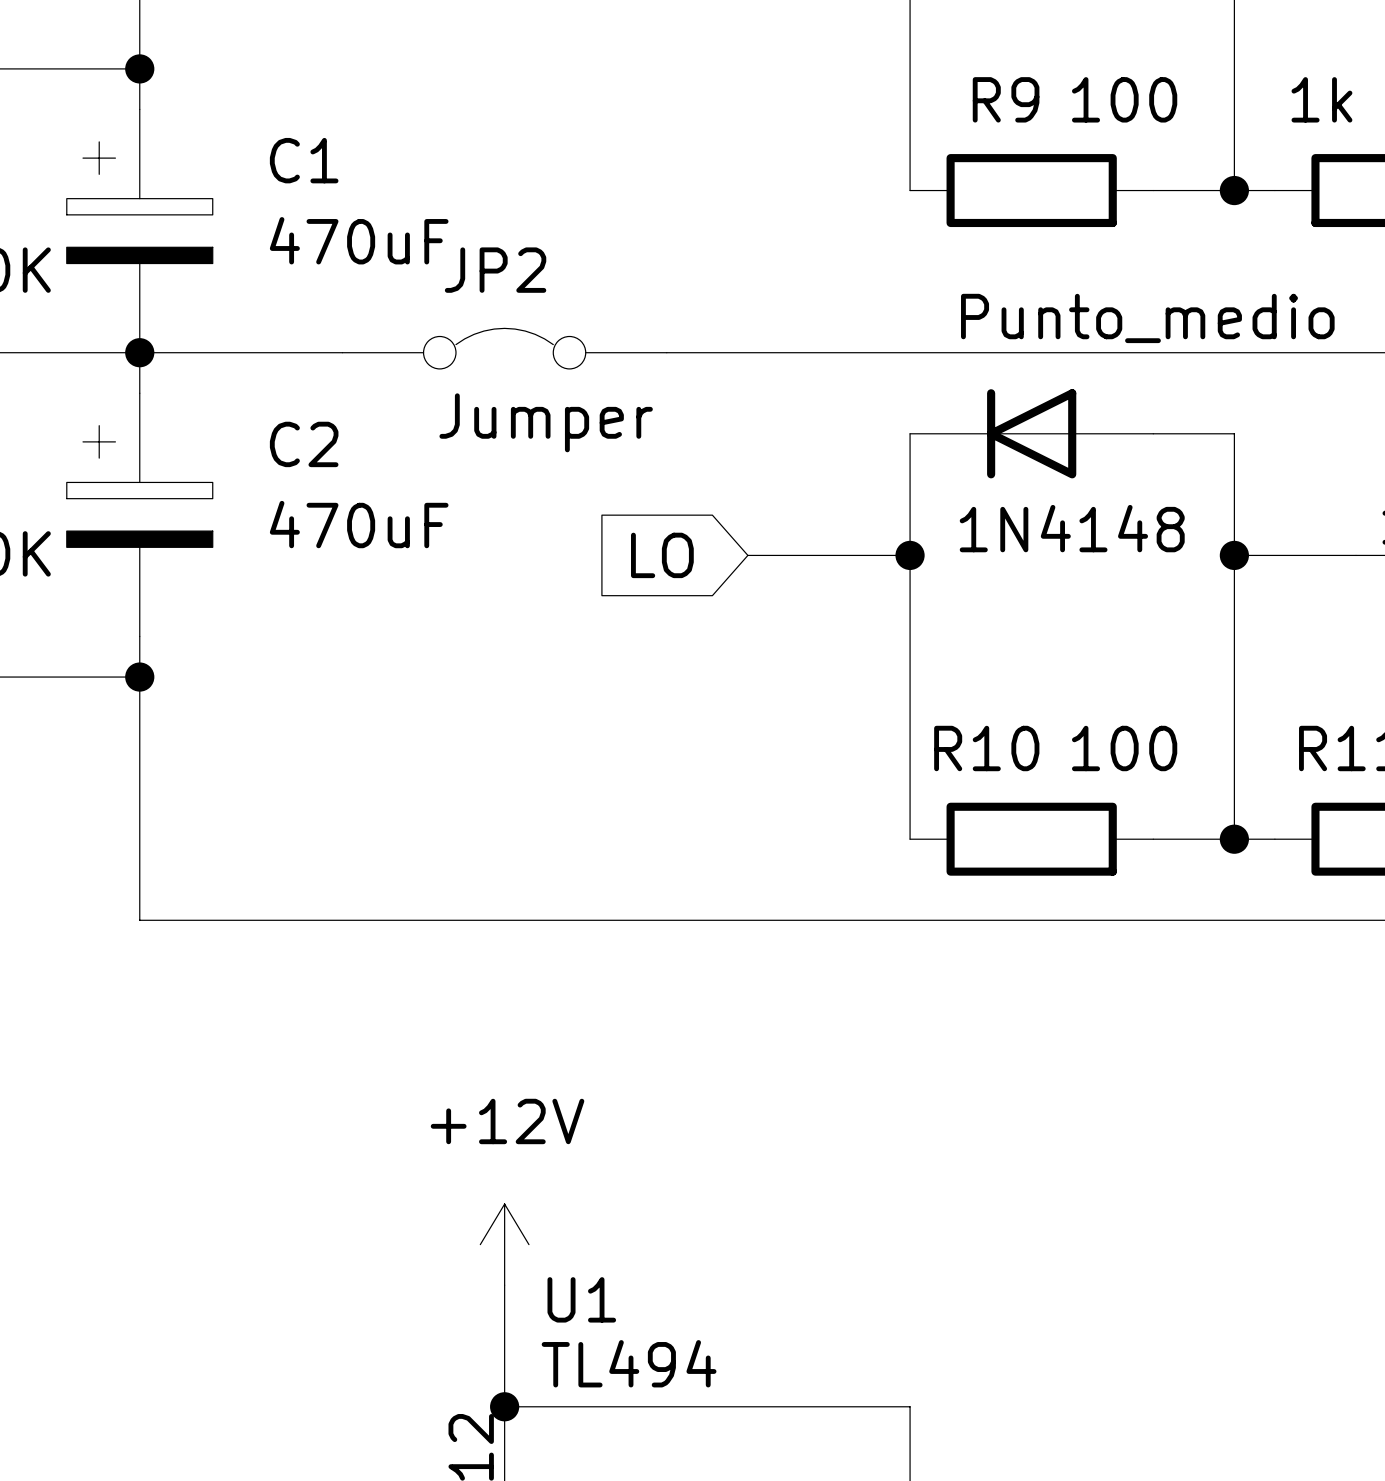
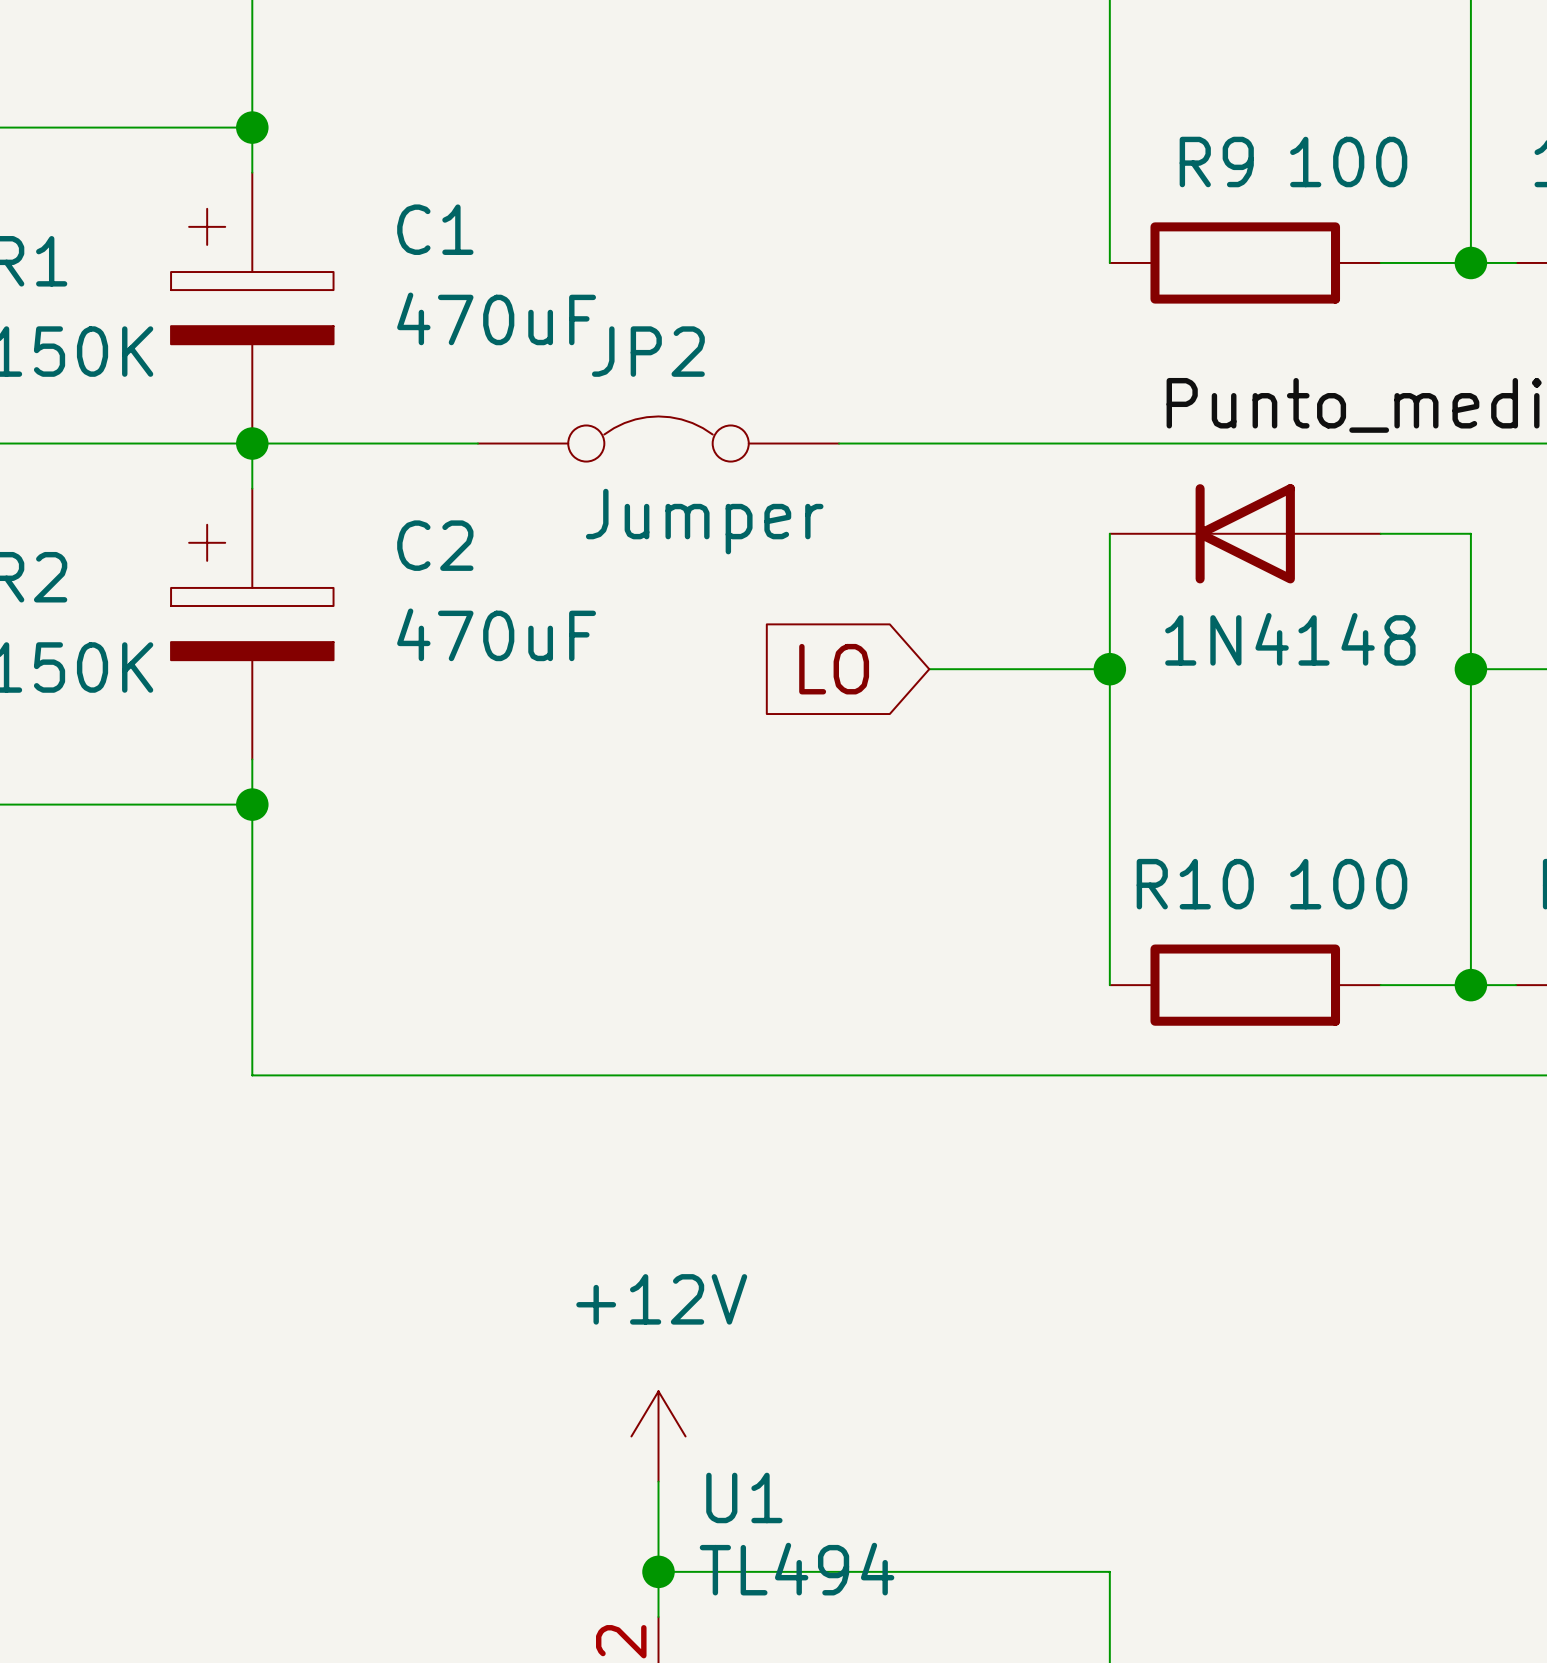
wire: (504, 1406) (910, 1406) -> (658, 1571) (1109, 1571) (1109, 1617)
junction position: (504, 1406) -> (658, 1571)

